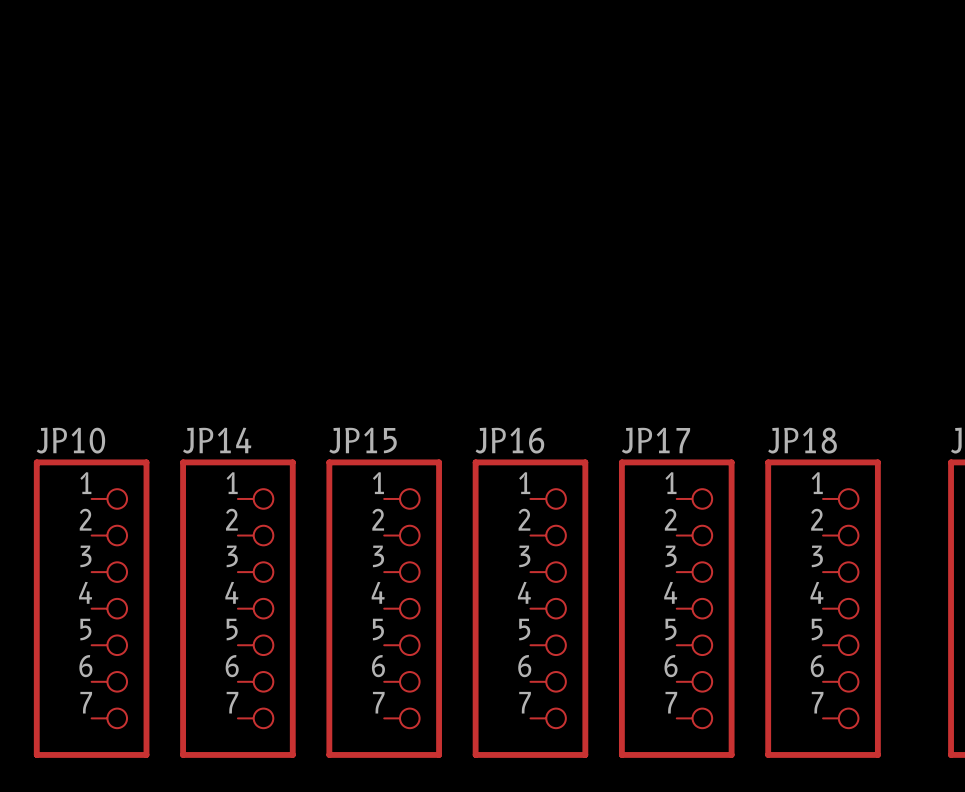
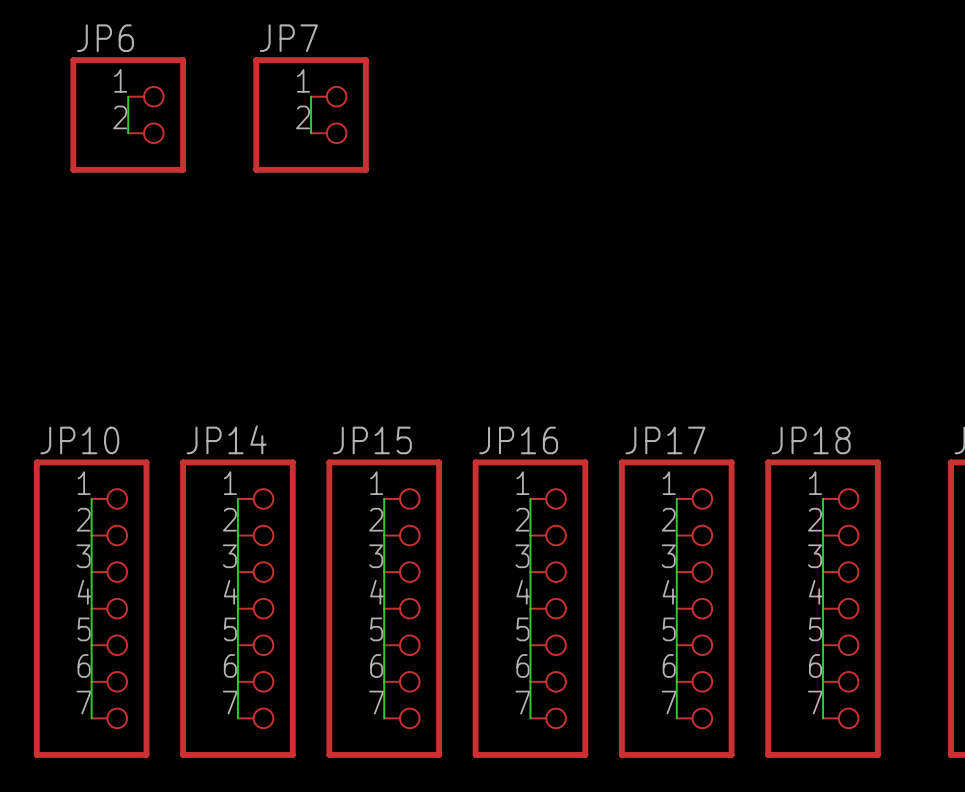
wire: none -> (128, 96) (128, 133)
wire: none -> (311, 96) (311, 133)
JP6: none -> (128, 114)
JP7: none -> (311, 114)
wire: none -> (91, 498) (91, 718)
wire: none -> (237, 498) (237, 718)
wire: none -> (384, 498) (384, 718)
wire: none -> (530, 498) (530, 718)
wire: none -> (676, 498) (676, 718)
wire: none -> (823, 498) (823, 718)

